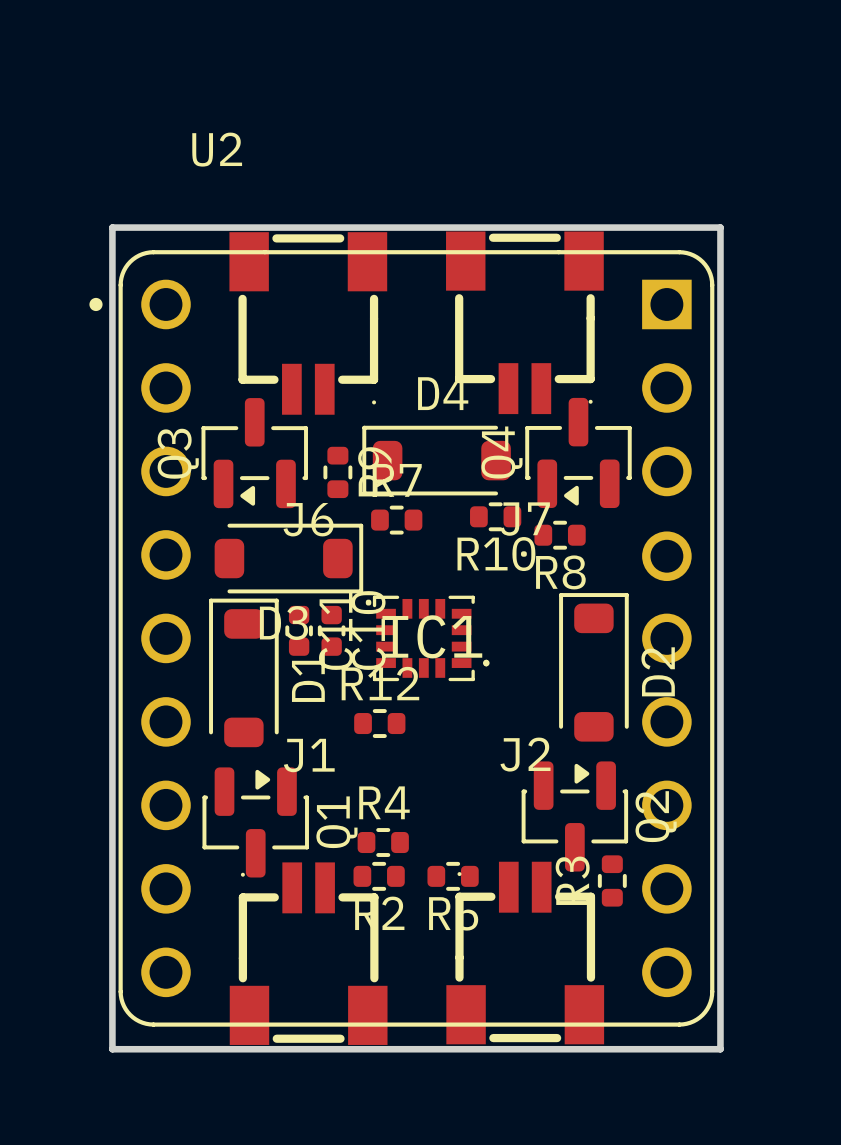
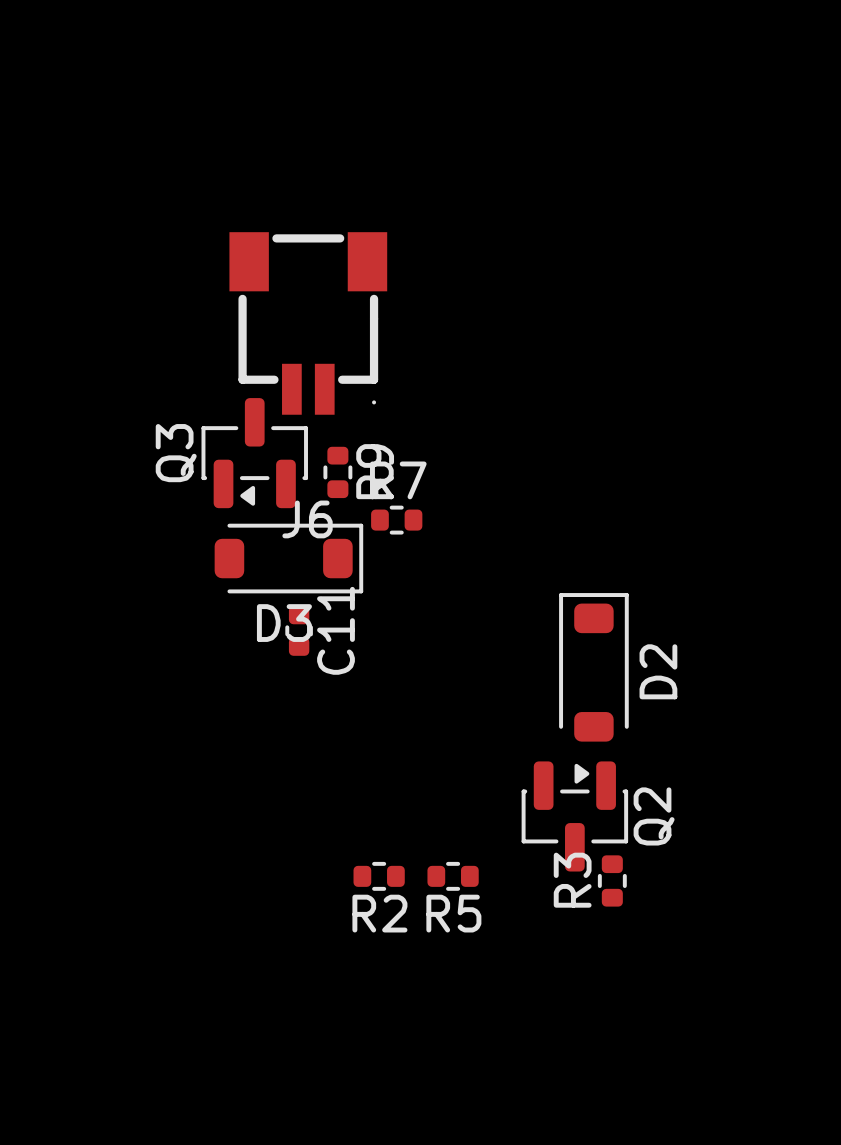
board edge: (112, 227) (720, 227) (720, 1049) (112, 1049) (112, 227) -> none
J7: (524, 322) -> none
Q4: (578, 452) -> none
D4: (436, 460) -> none
R10: (495, 516) -> none
R8: (560, 535) -> none
C10: (331, 630) -> none
U2: (401, 638) -> none
IC1: (431, 638) -> none
D1: (243, 672) -> none
R12: (379, 723) -> none
Q1: (255, 822) -> none
R4: (383, 842) -> none
J1: (308, 953) -> none
J2: (525, 953) -> none

